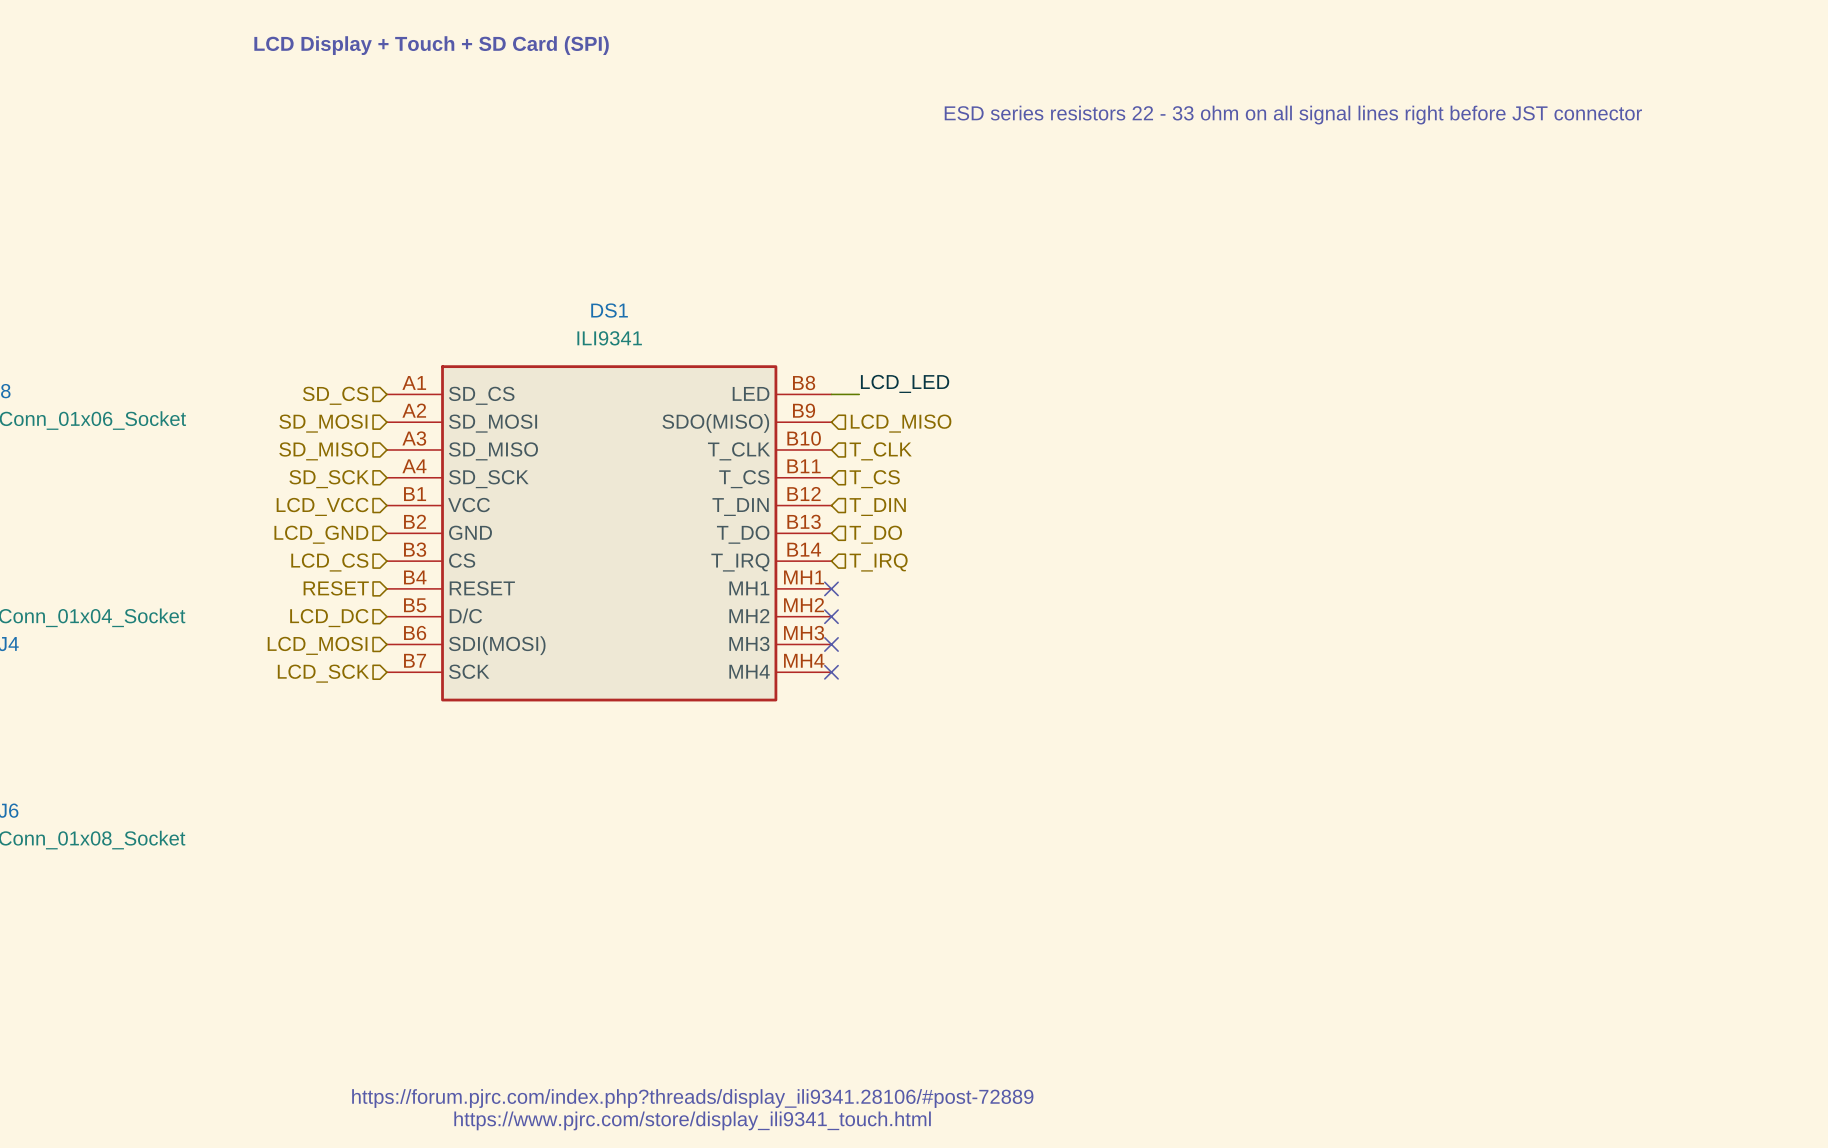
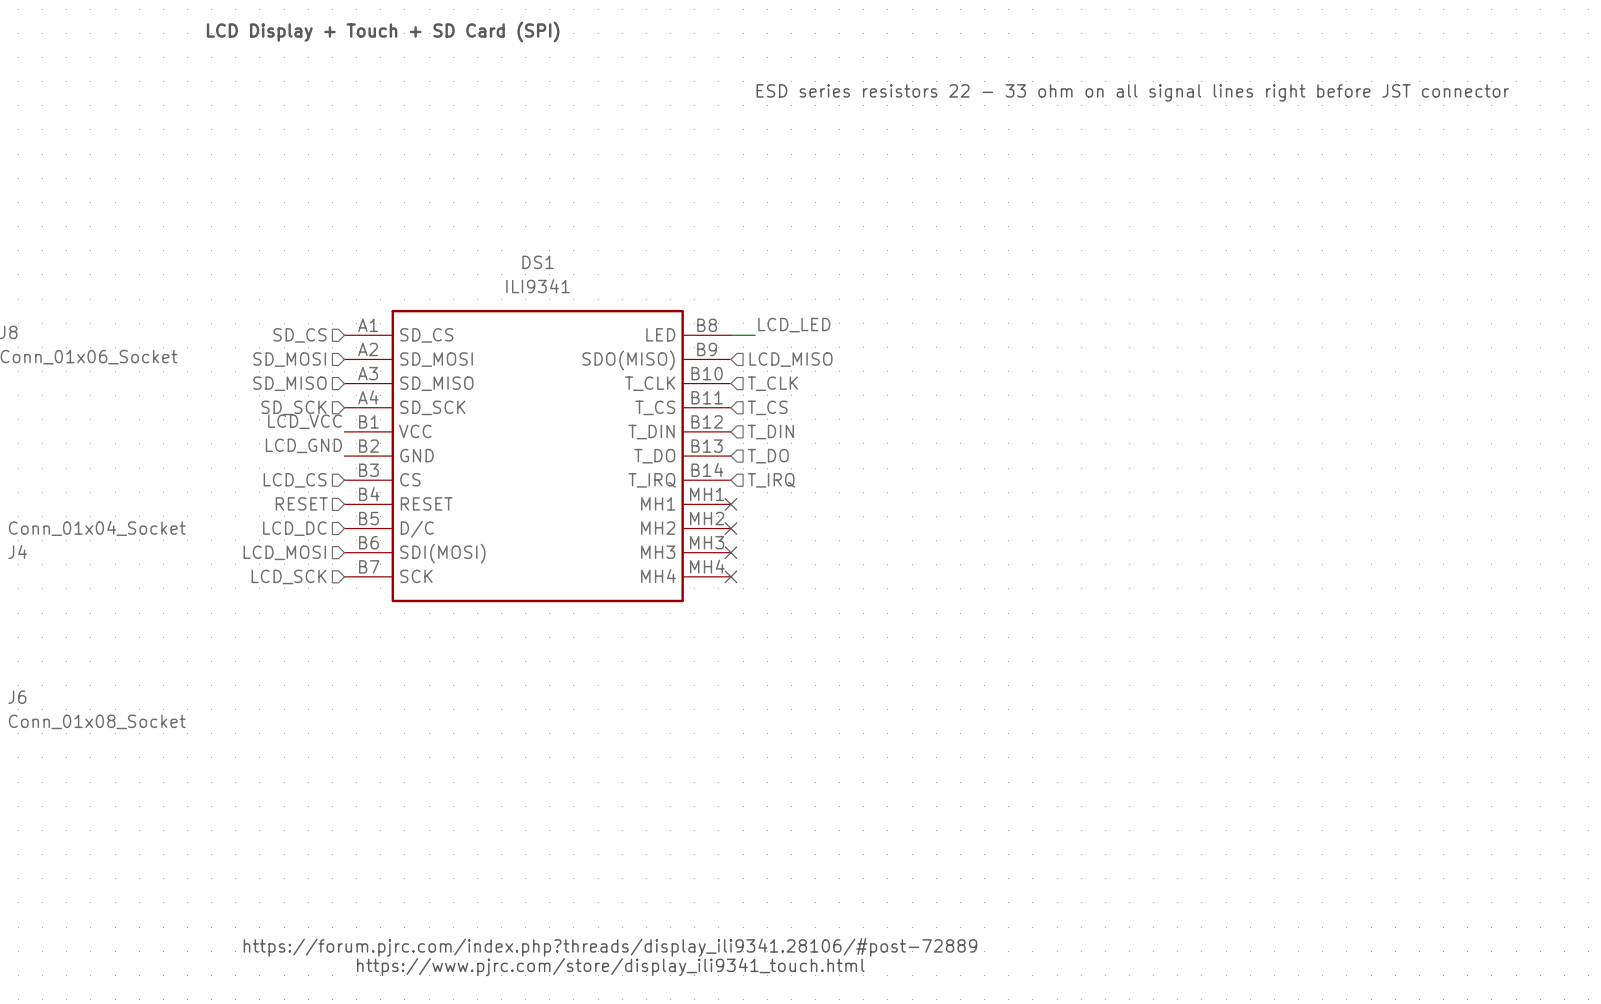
label: none -> LCD_VCC (305, 421)
hierarchical label: LCD_VCC (322, 506) -> none
label: none -> LCD_GND (303, 445)
hierarchical label: LCD_GND (321, 534) -> none

